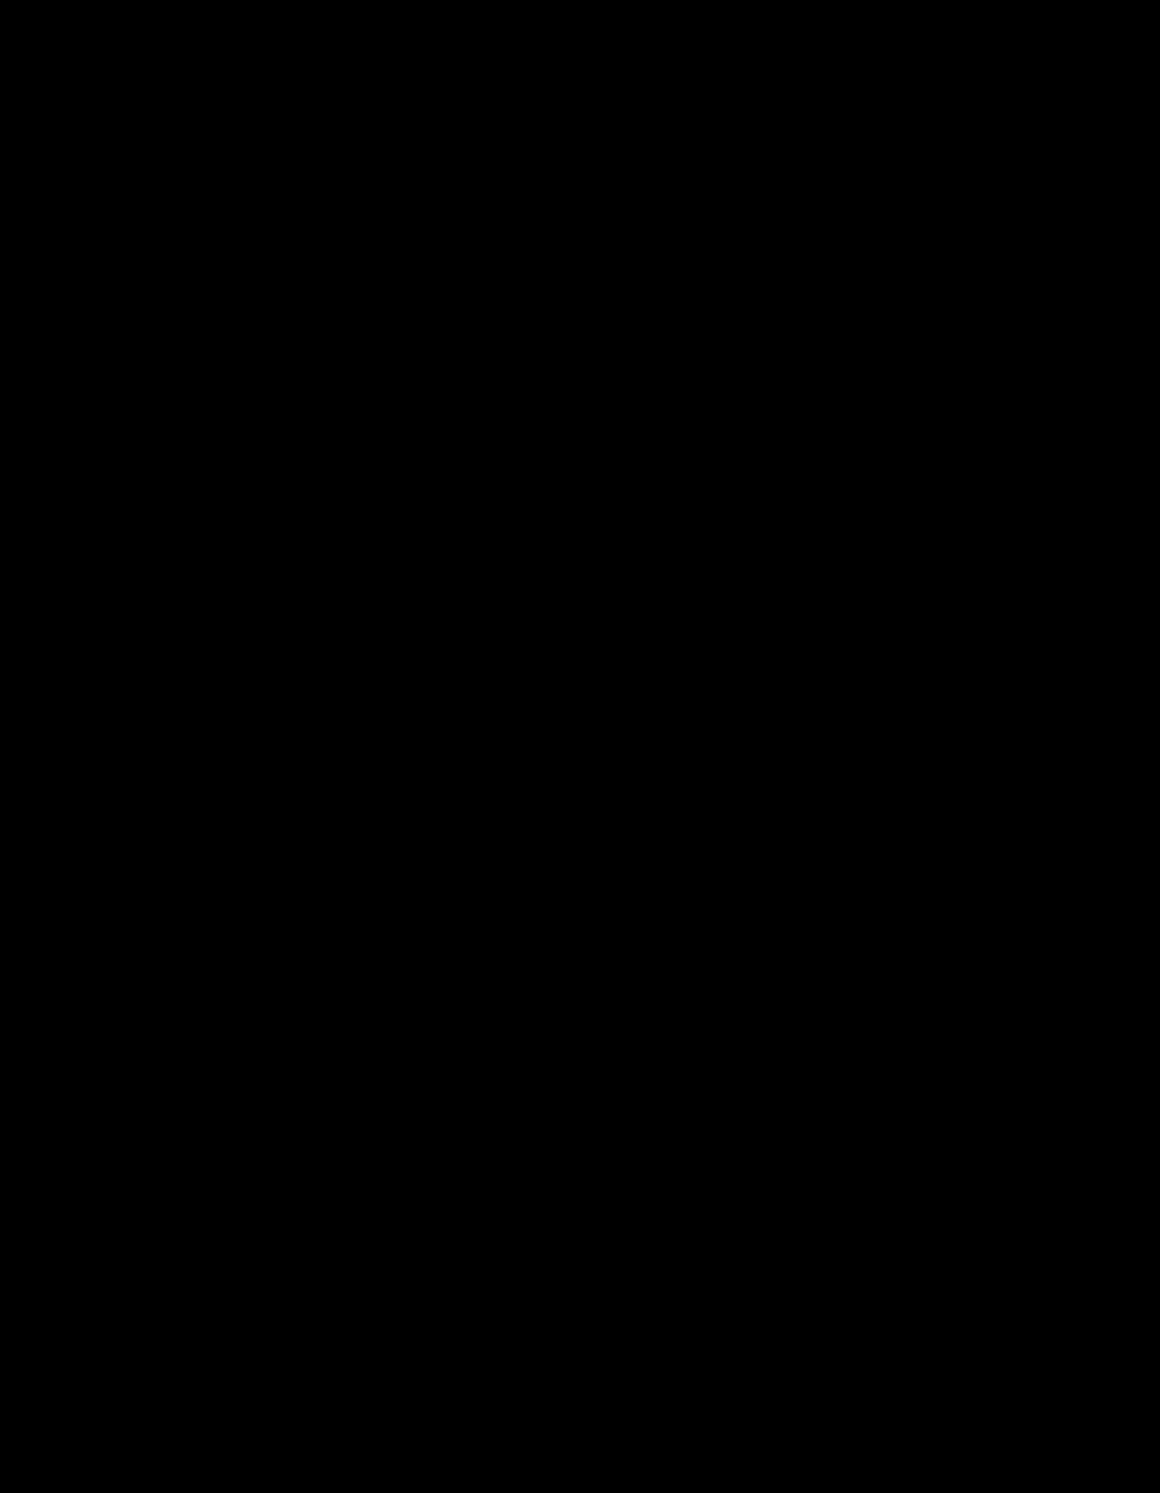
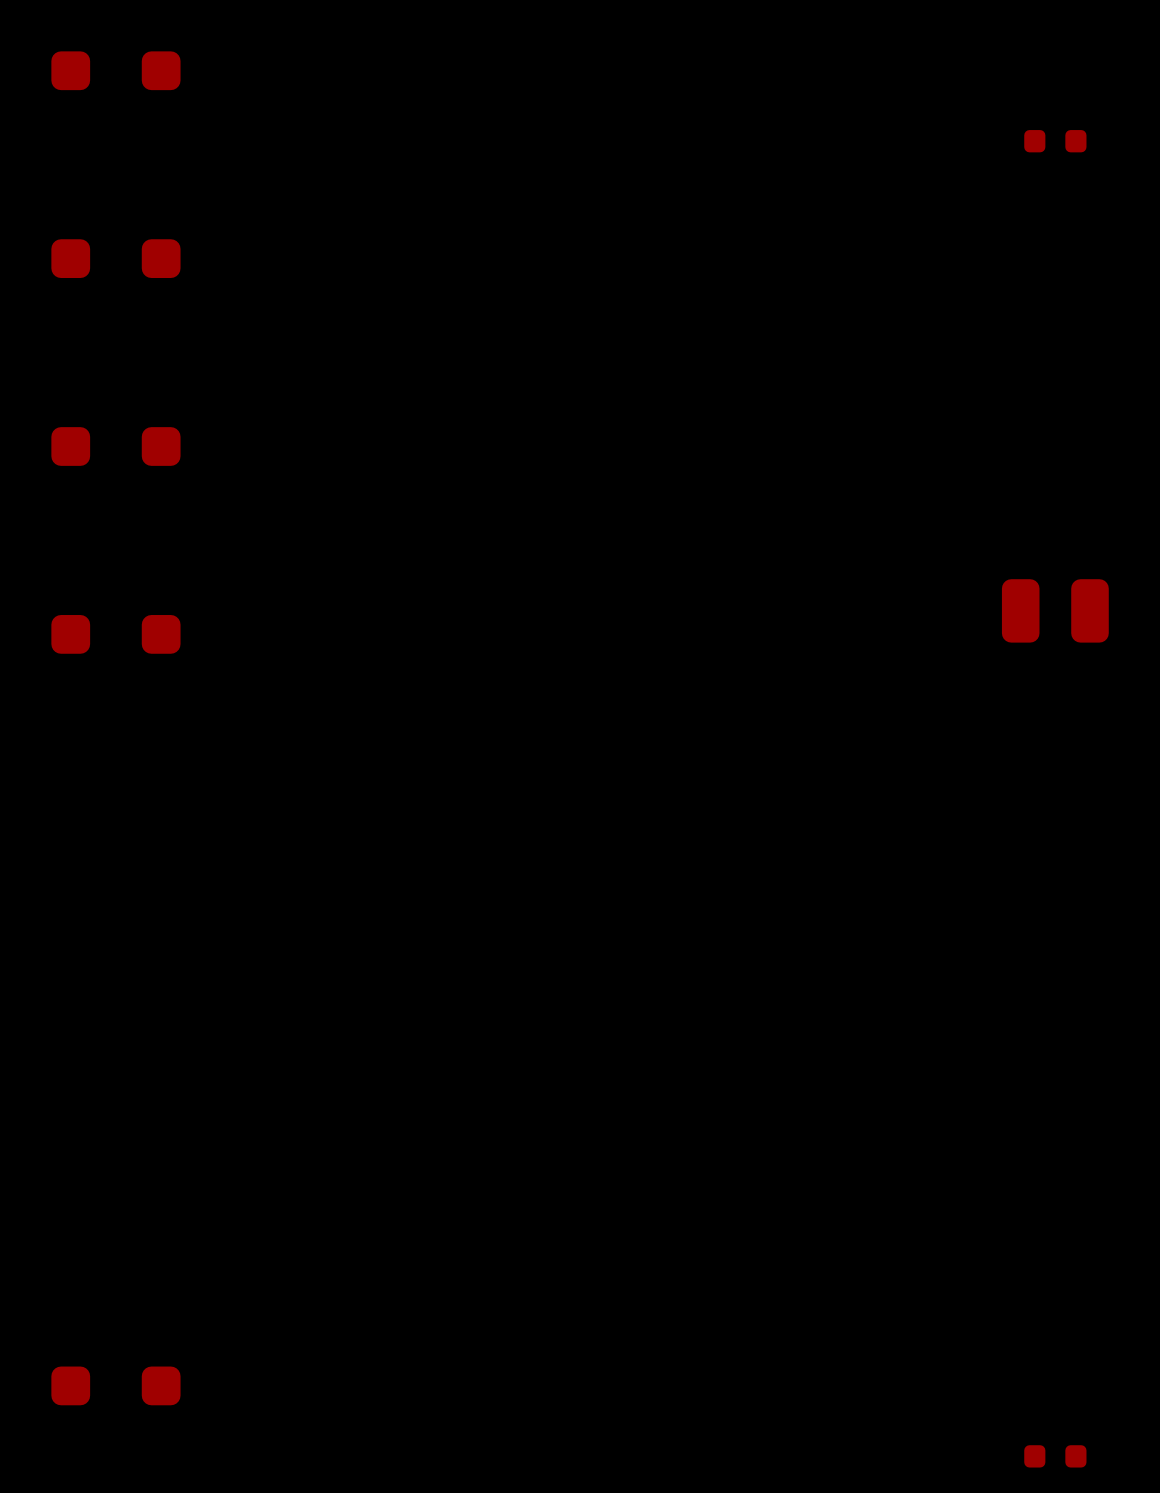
part: none -> (115, 70)
part: none -> (1055, 141)
part: none -> (115, 258)
part: none -> (115, 446)
part: none -> (1055, 610)
part: none -> (115, 634)
part: none -> (115, 1385)
part: none -> (1055, 1456)

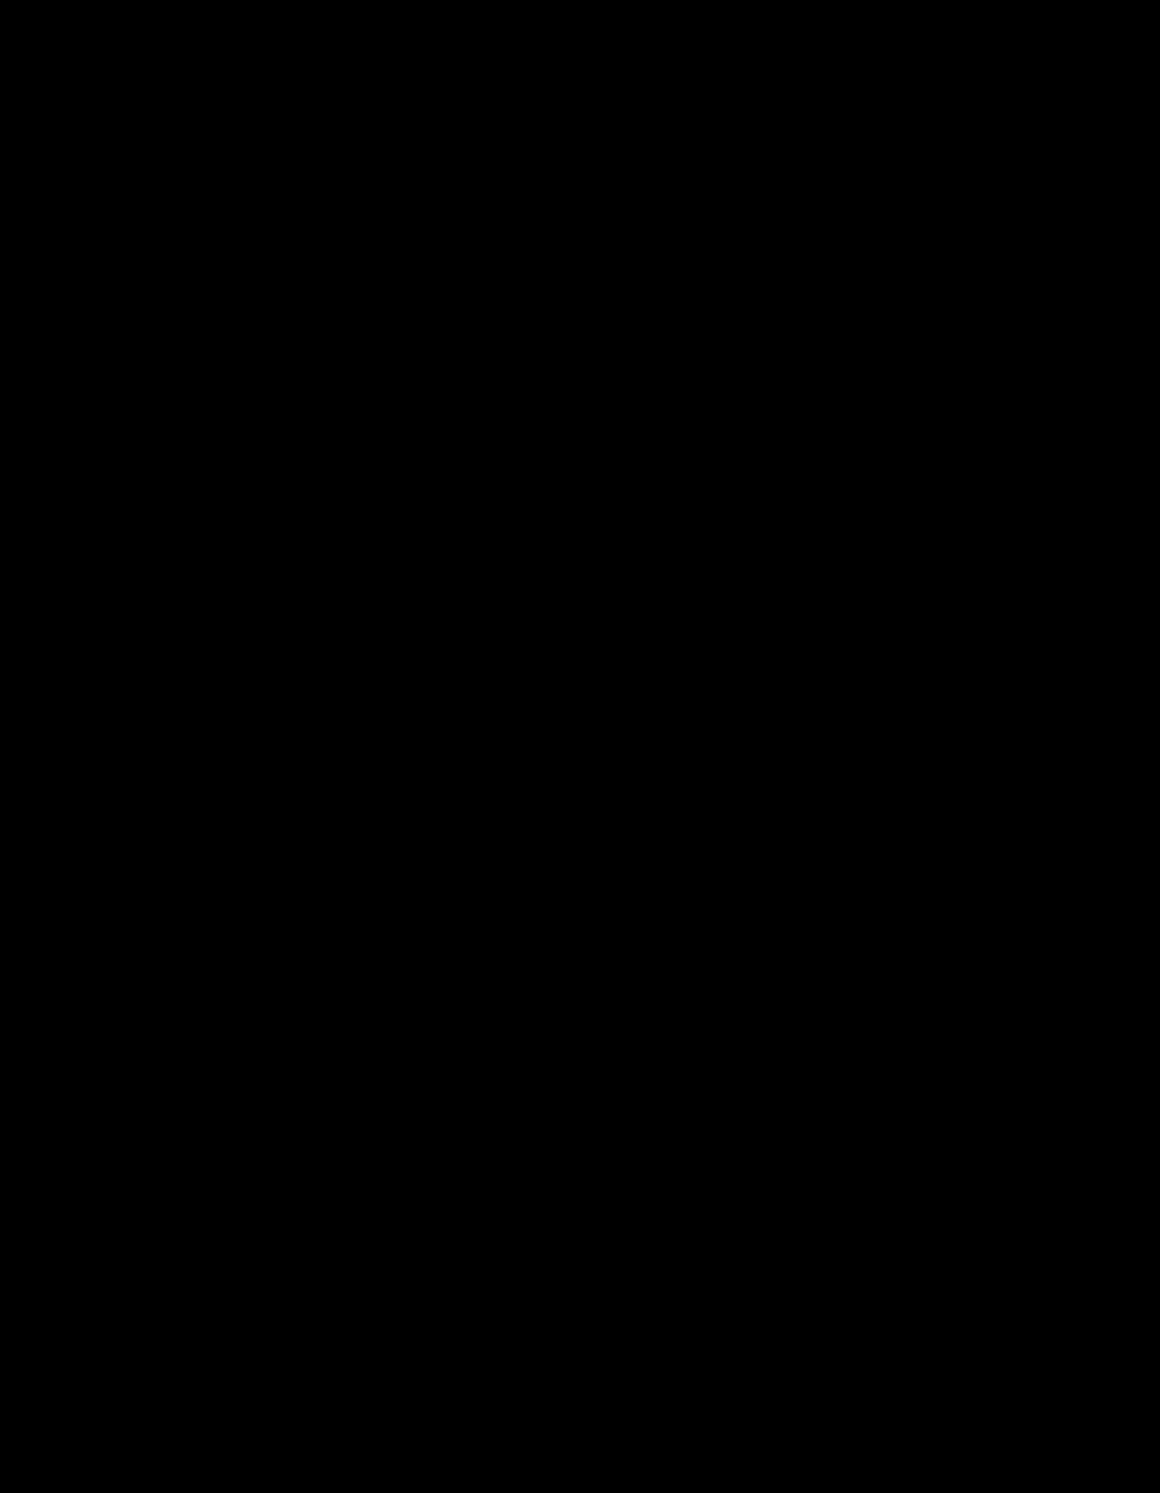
part: (115, 70) -> none
part: (1055, 141) -> none
part: (115, 258) -> none
part: (115, 446) -> none
part: (1055, 610) -> none
part: (115, 634) -> none
part: (115, 1385) -> none
part: (1055, 1456) -> none

